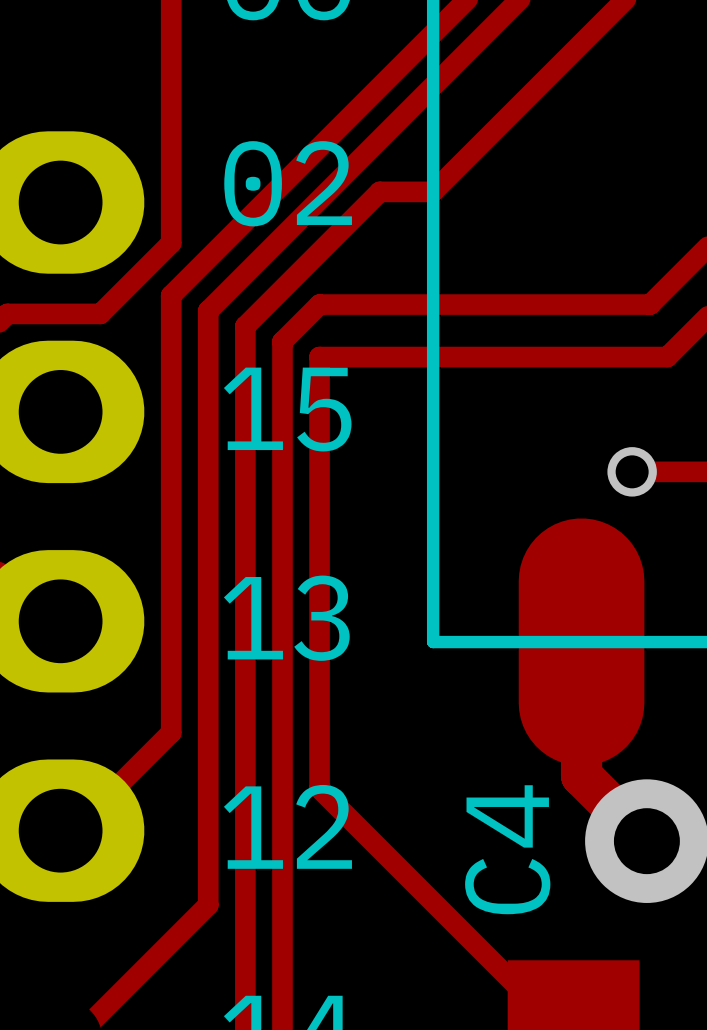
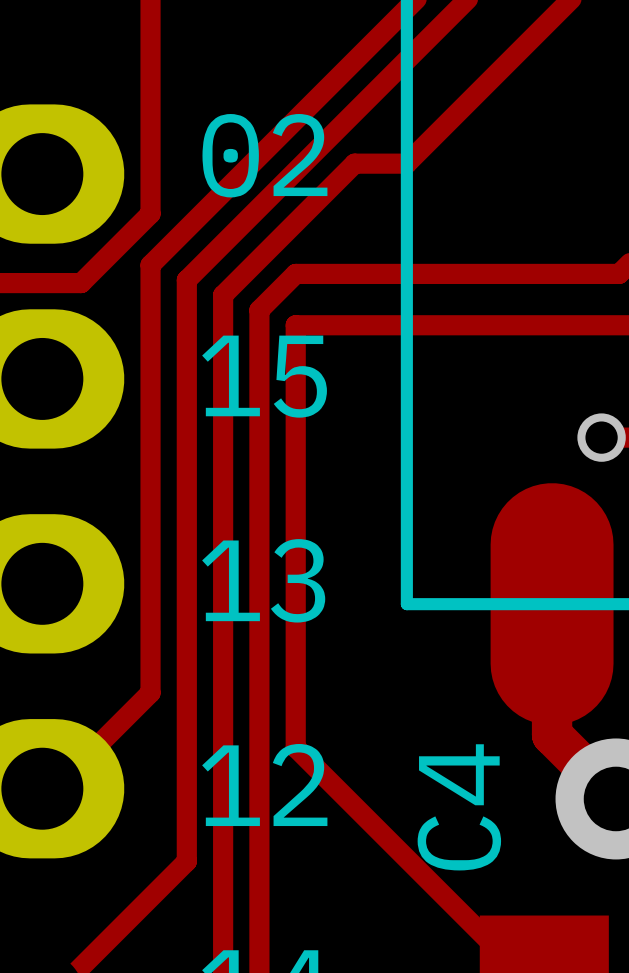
C4 name position: C4 (507, 849) -> C4 (459, 807)

